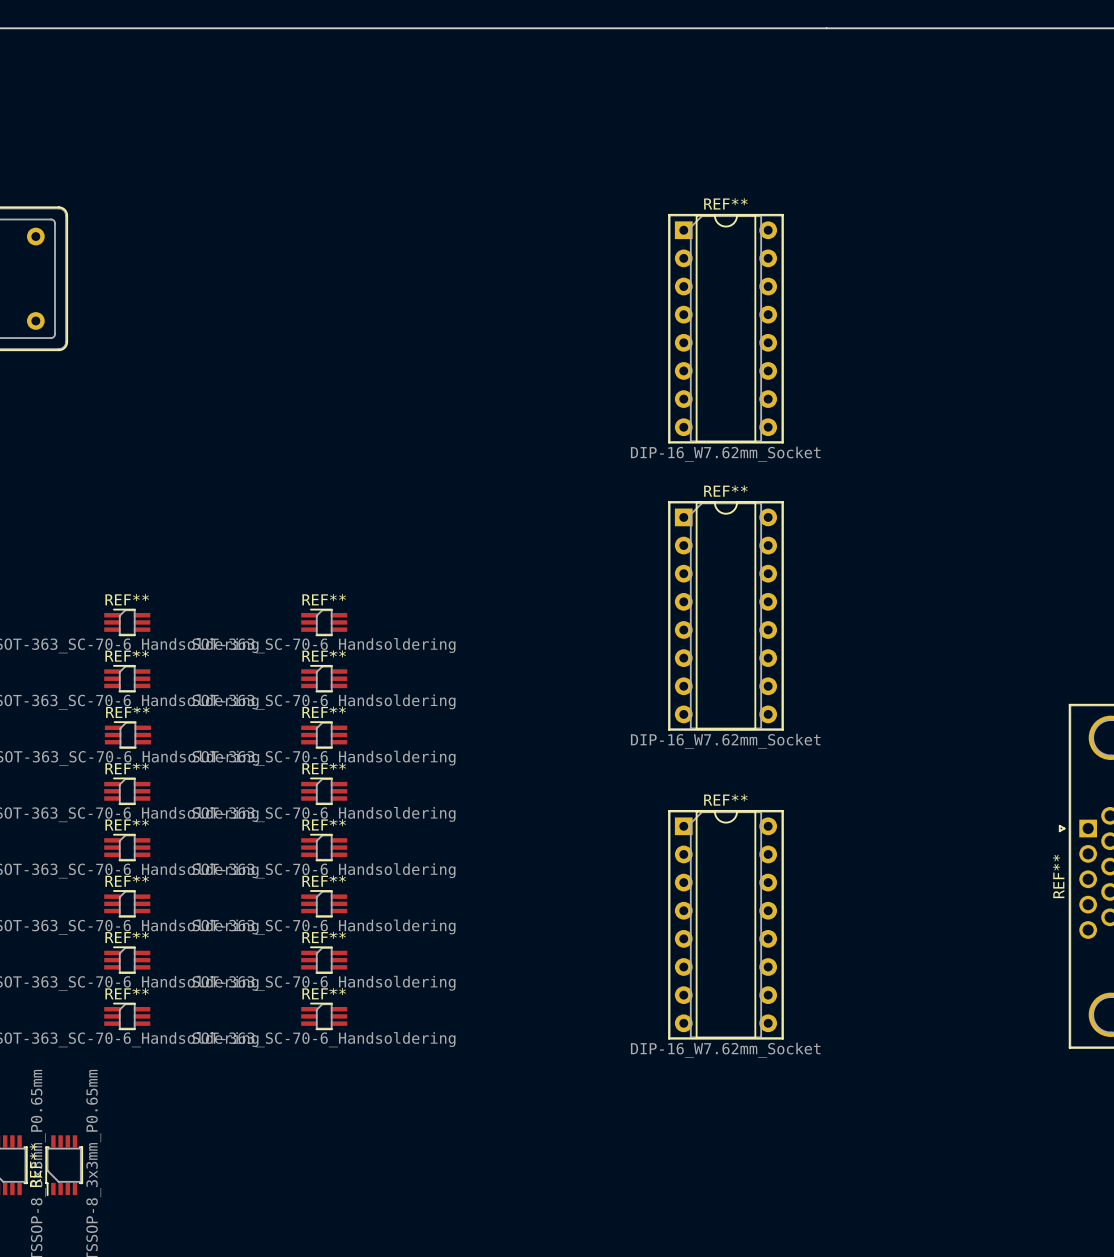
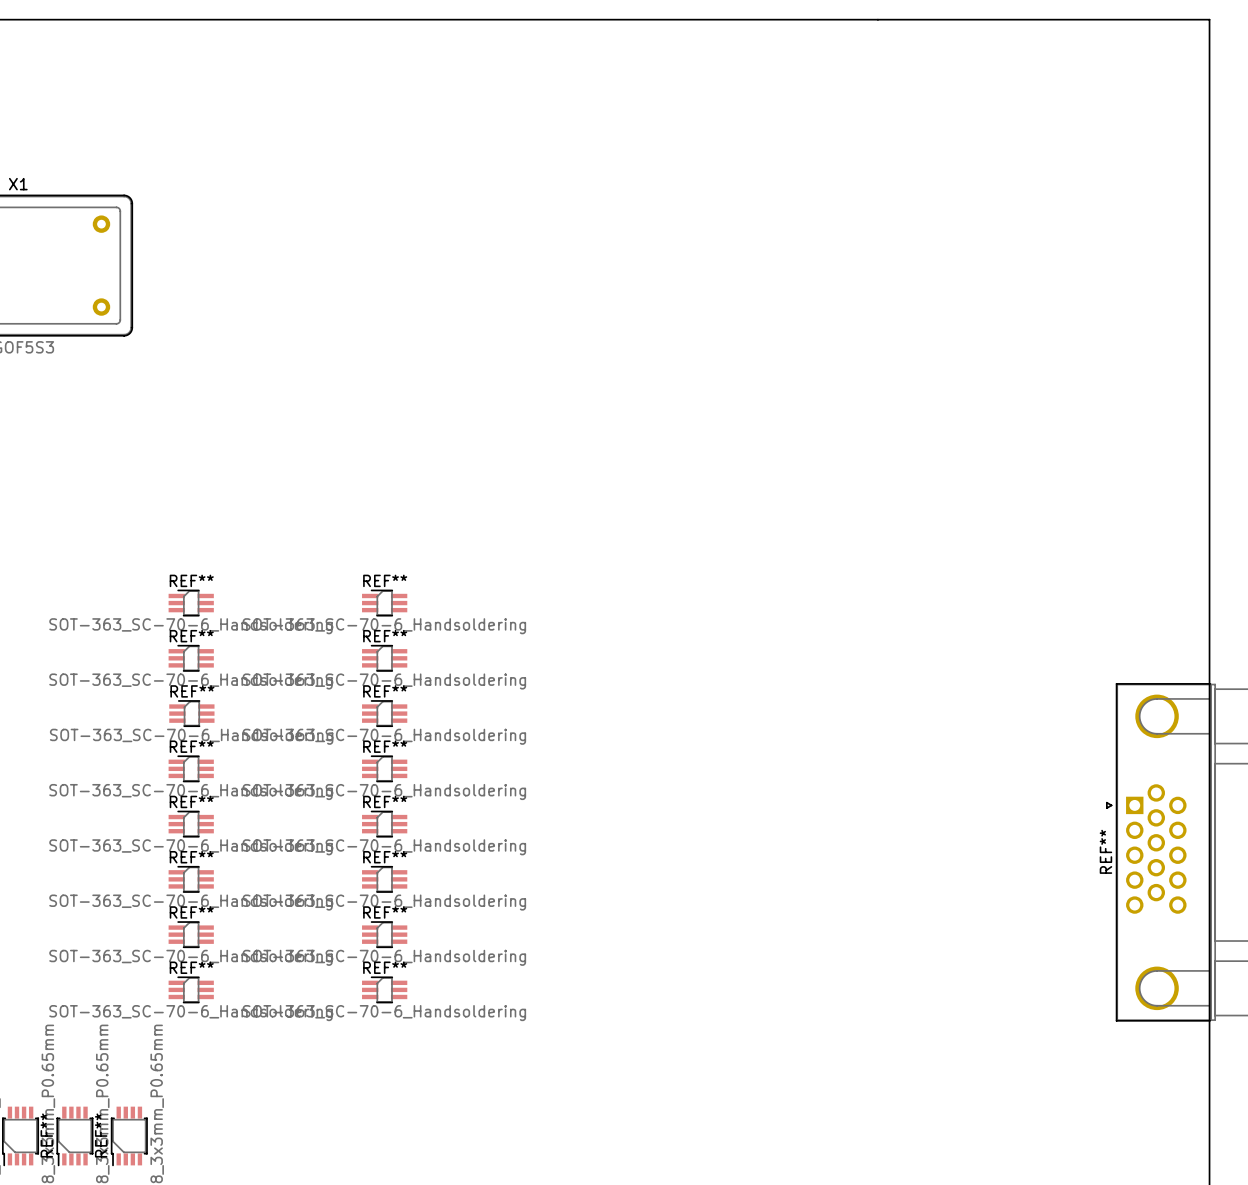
REF**: DIP-16_W7.62mm_Socket (725, 328) -> none
REF**: DIP-16_W7.62mm_Socket (725, 615) -> none
REF**: DIP-16_W7.62mm_Socket (725, 924) -> none

